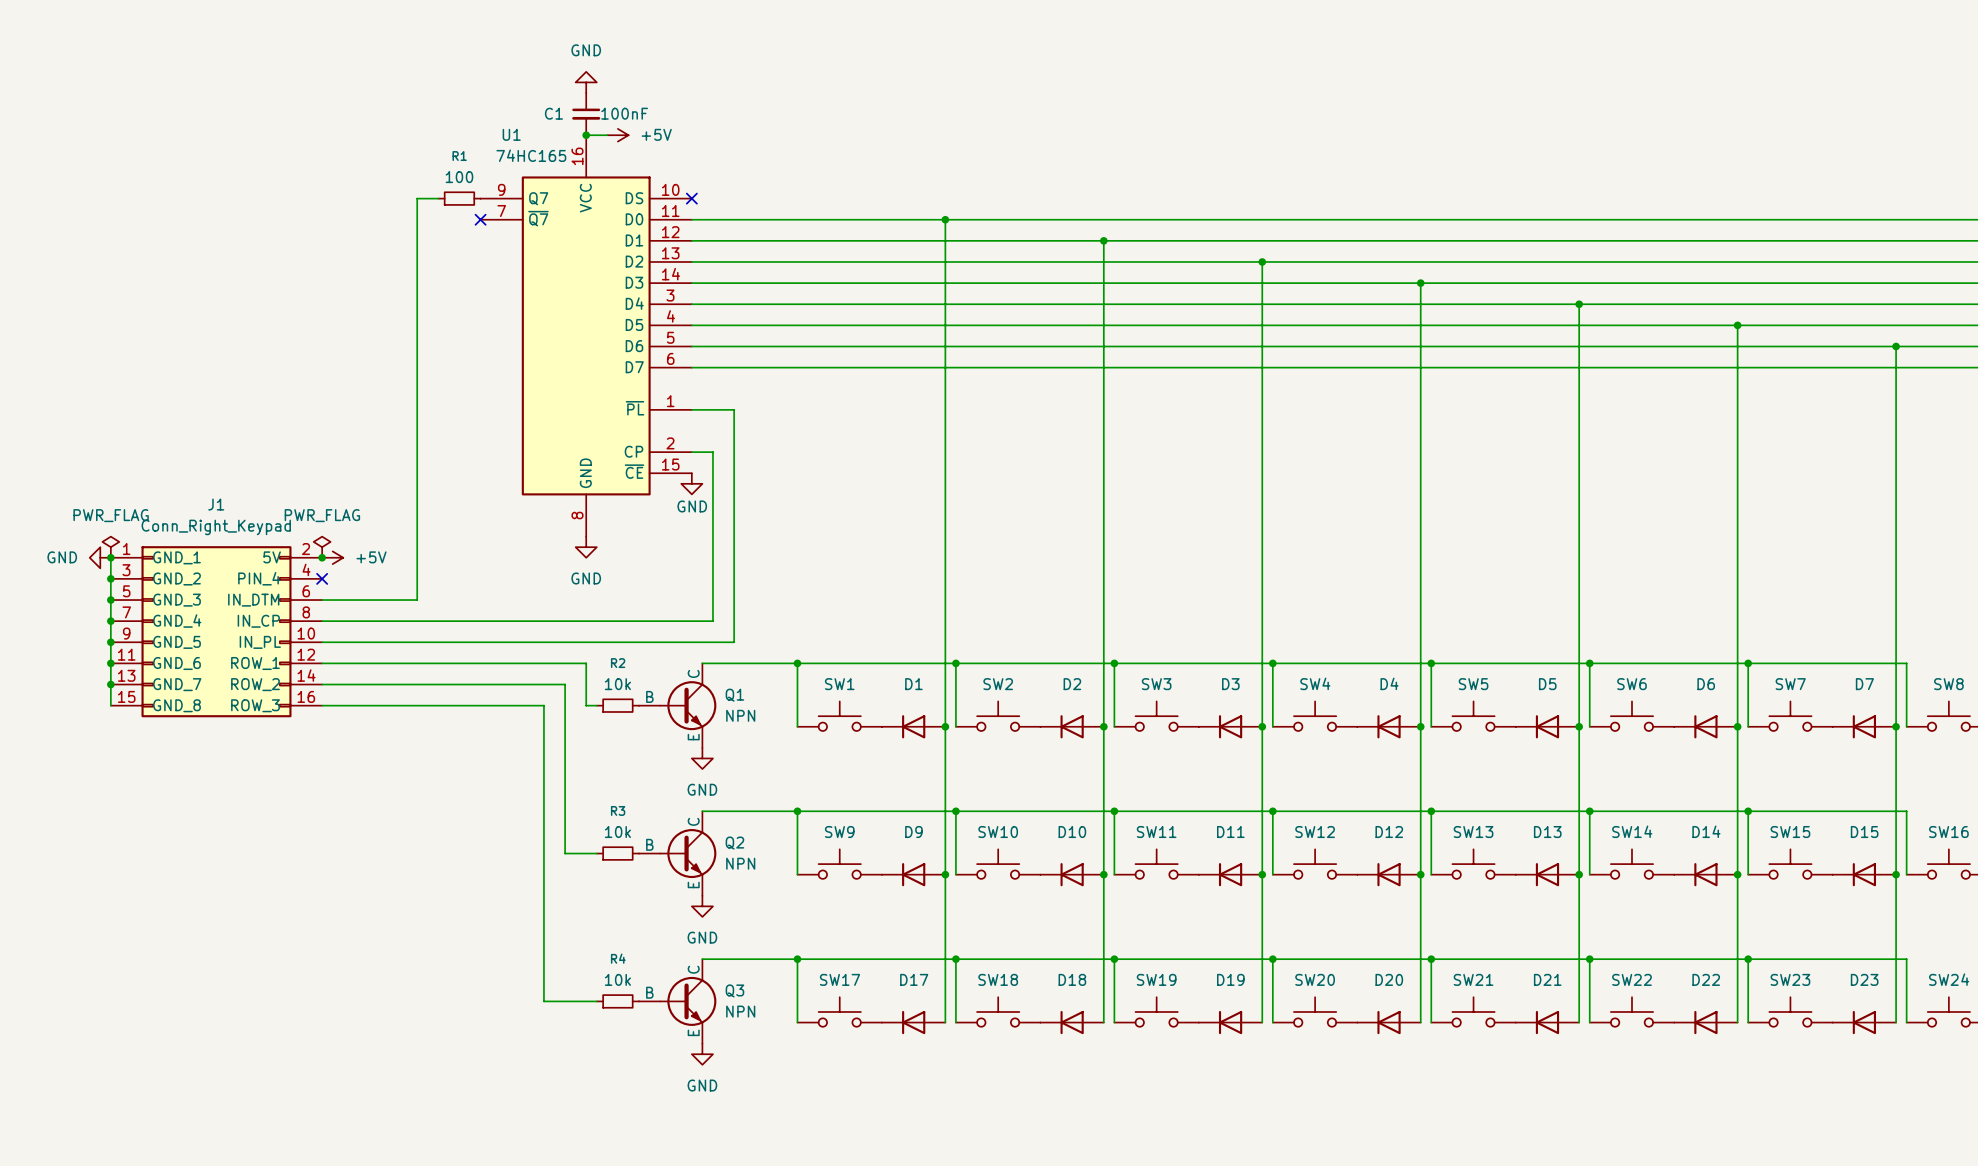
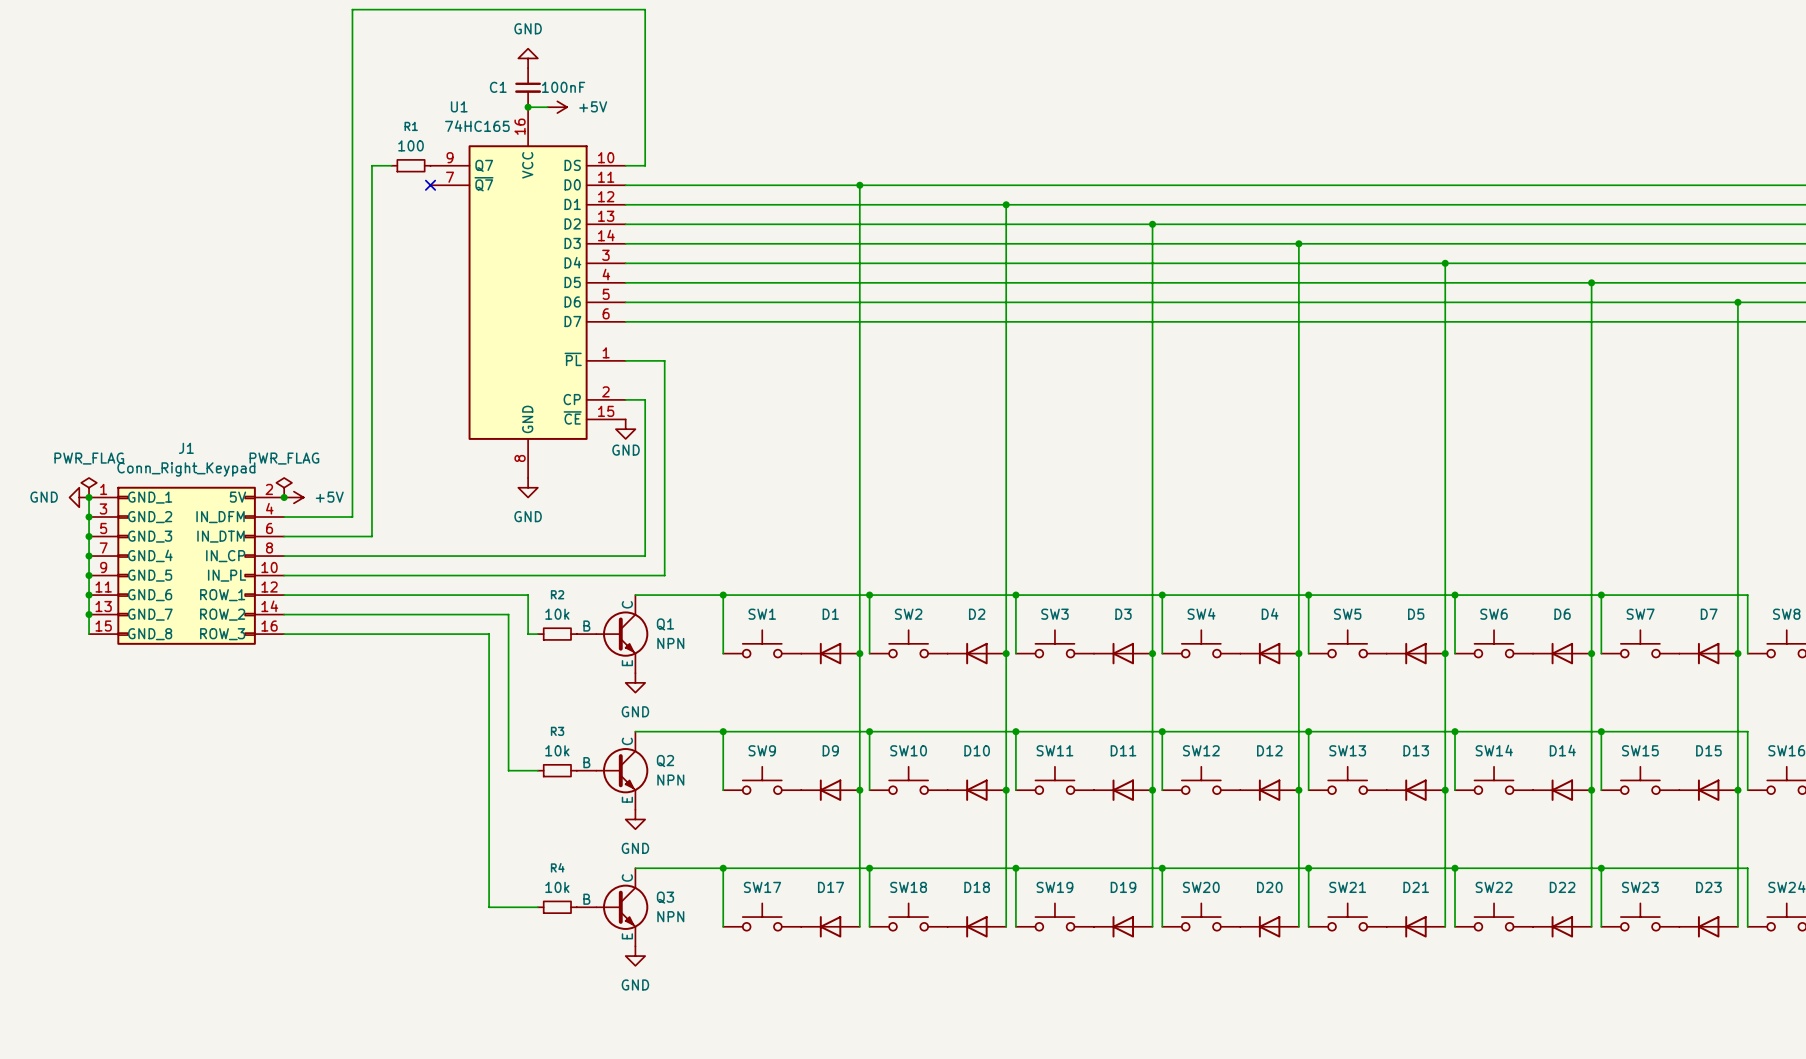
wire: none -> (625, 165) (645, 165) (645, 9) (352, 9) (352, 517) (284, 517)
no-connect mark: (691, 198) -> none
J1 pin name: PIN_4 (259, 578) -> IN_DFM (220, 517)
no-connect mark: (322, 578) -> none

